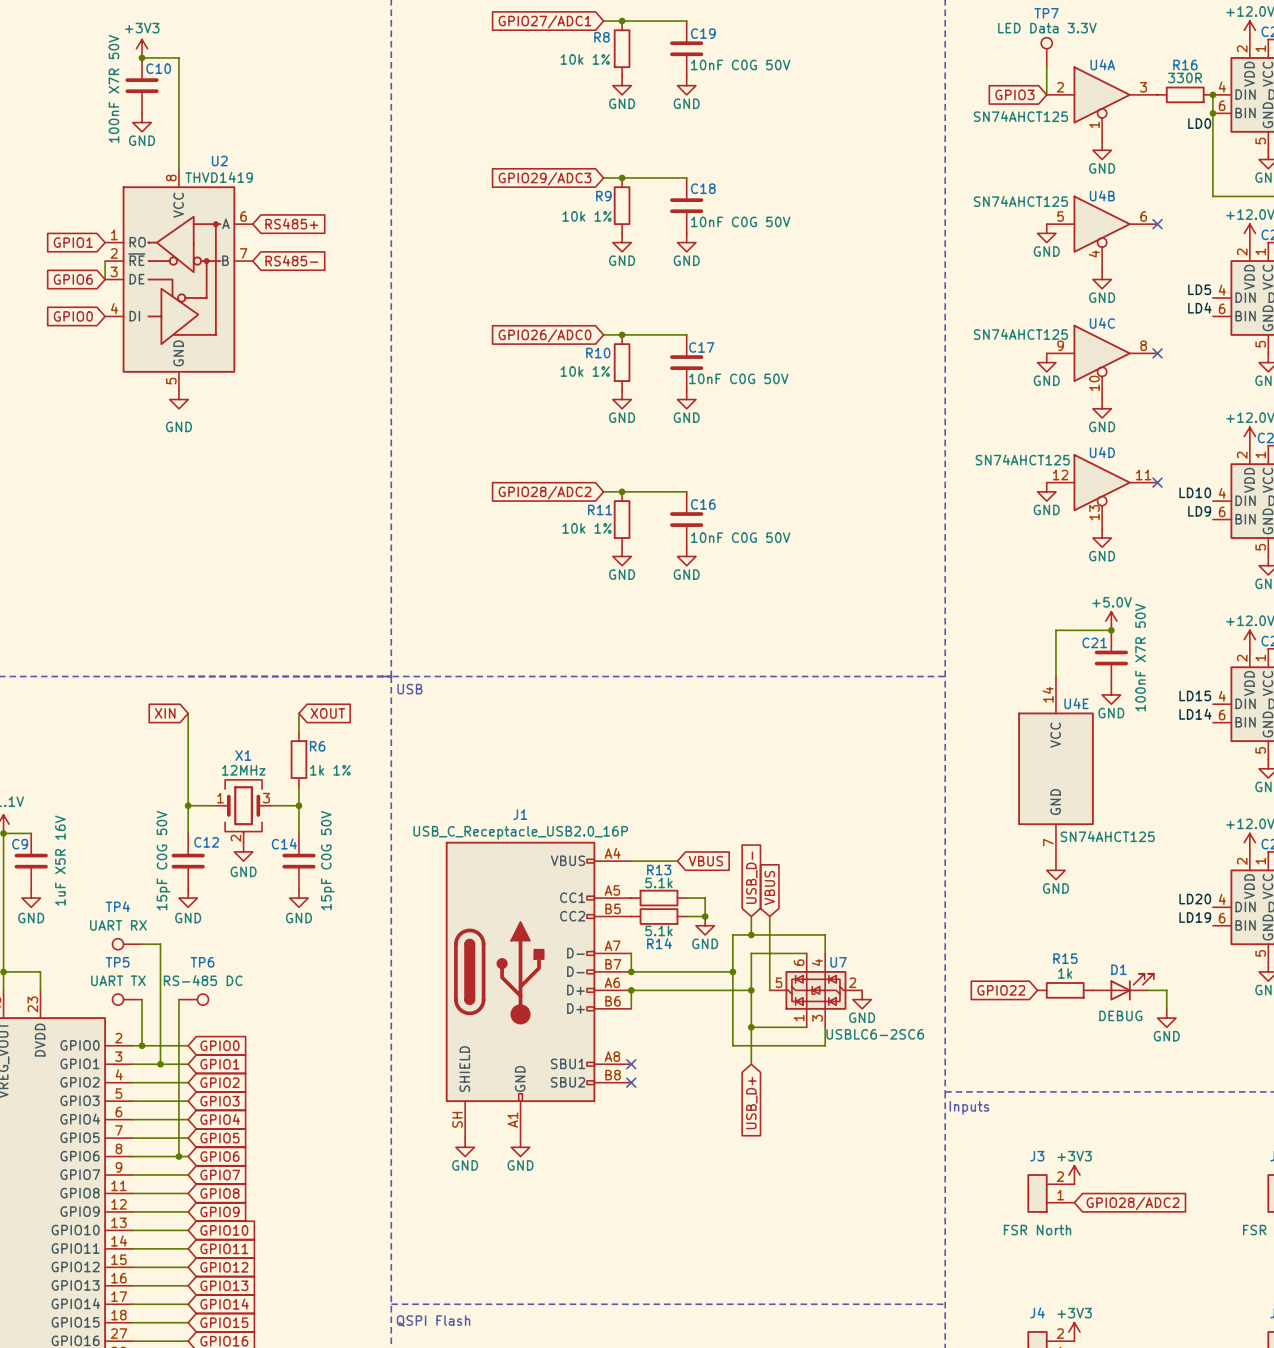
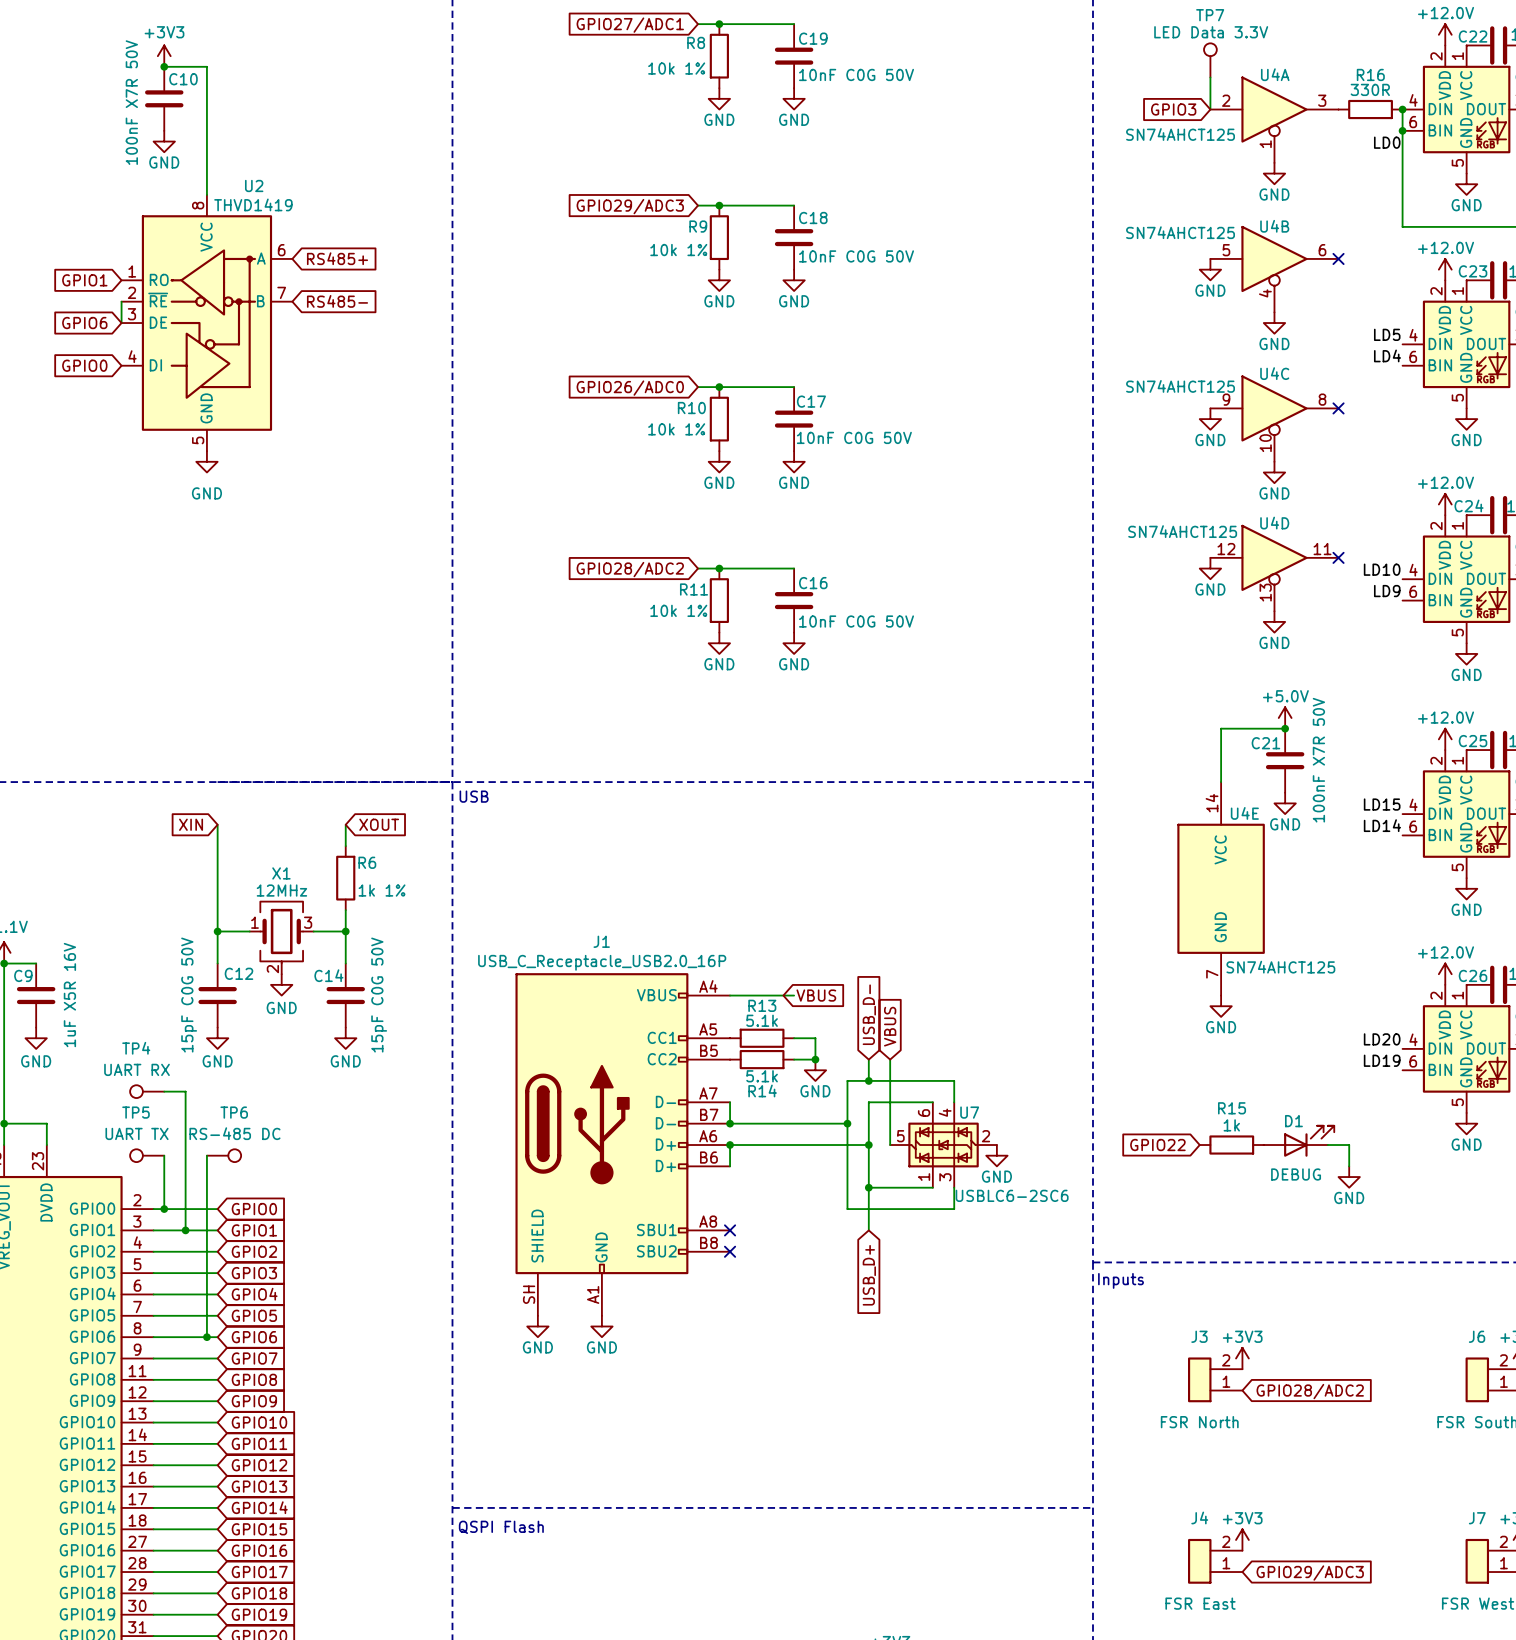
wire: none -> (783, 995) (794, 995)

